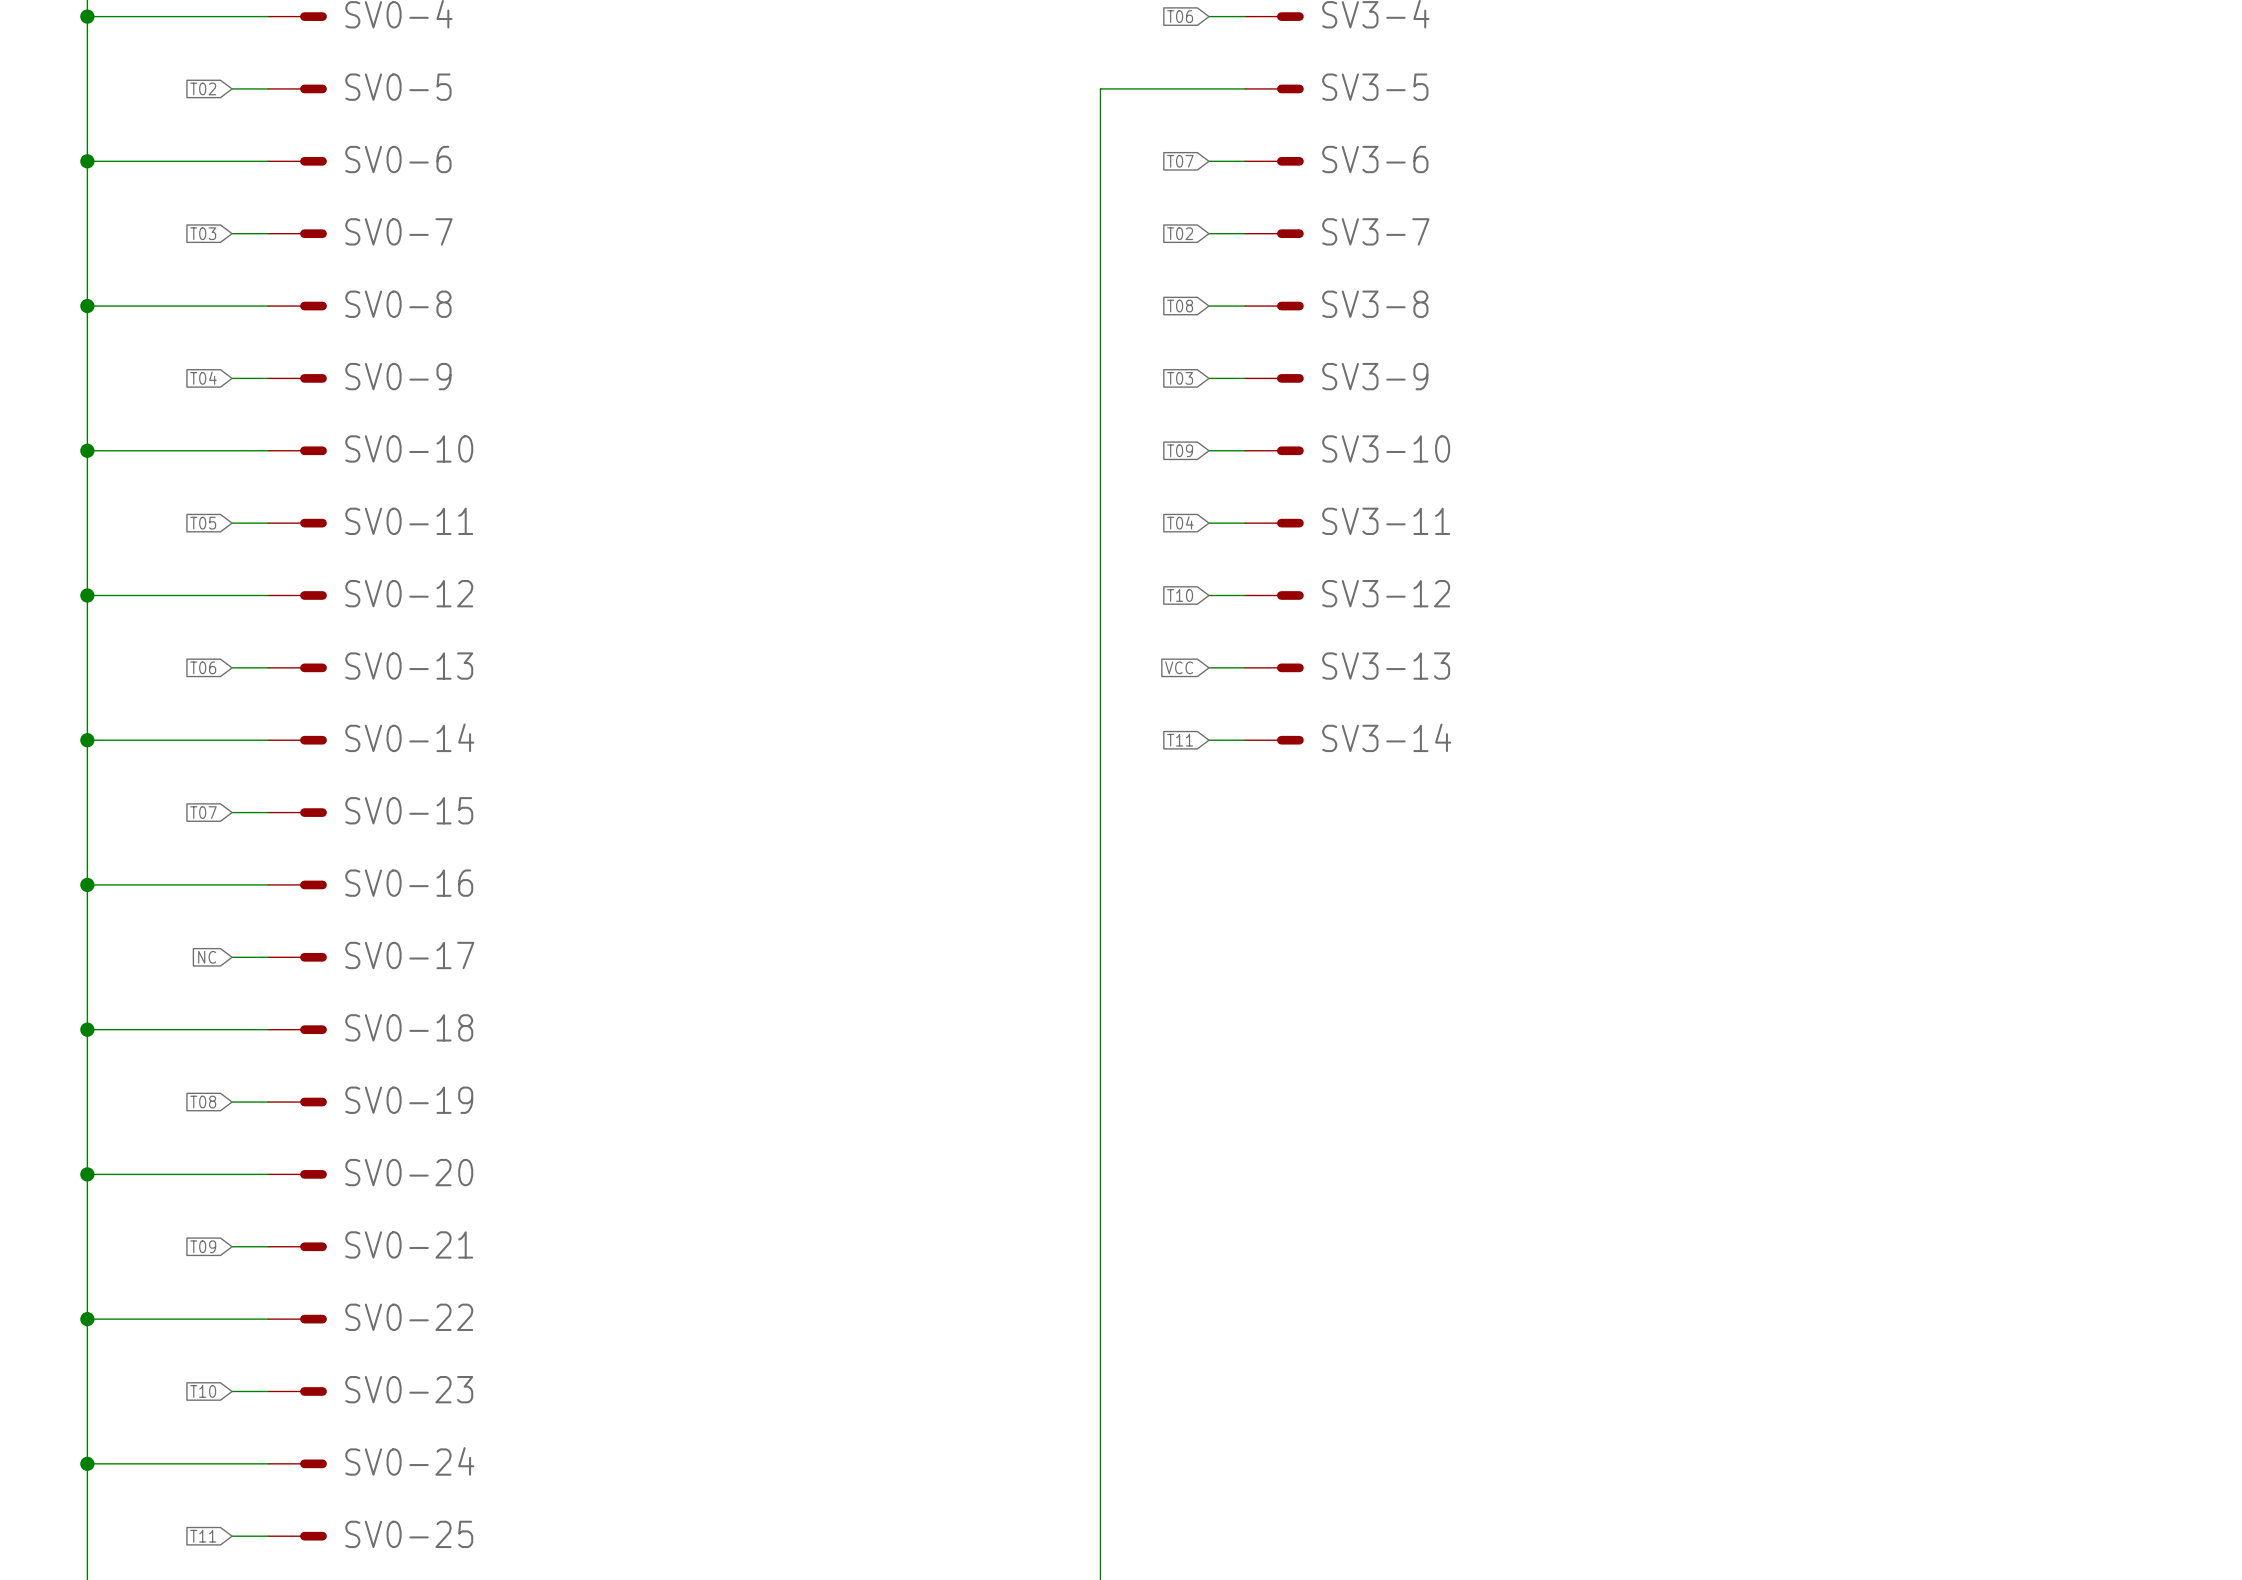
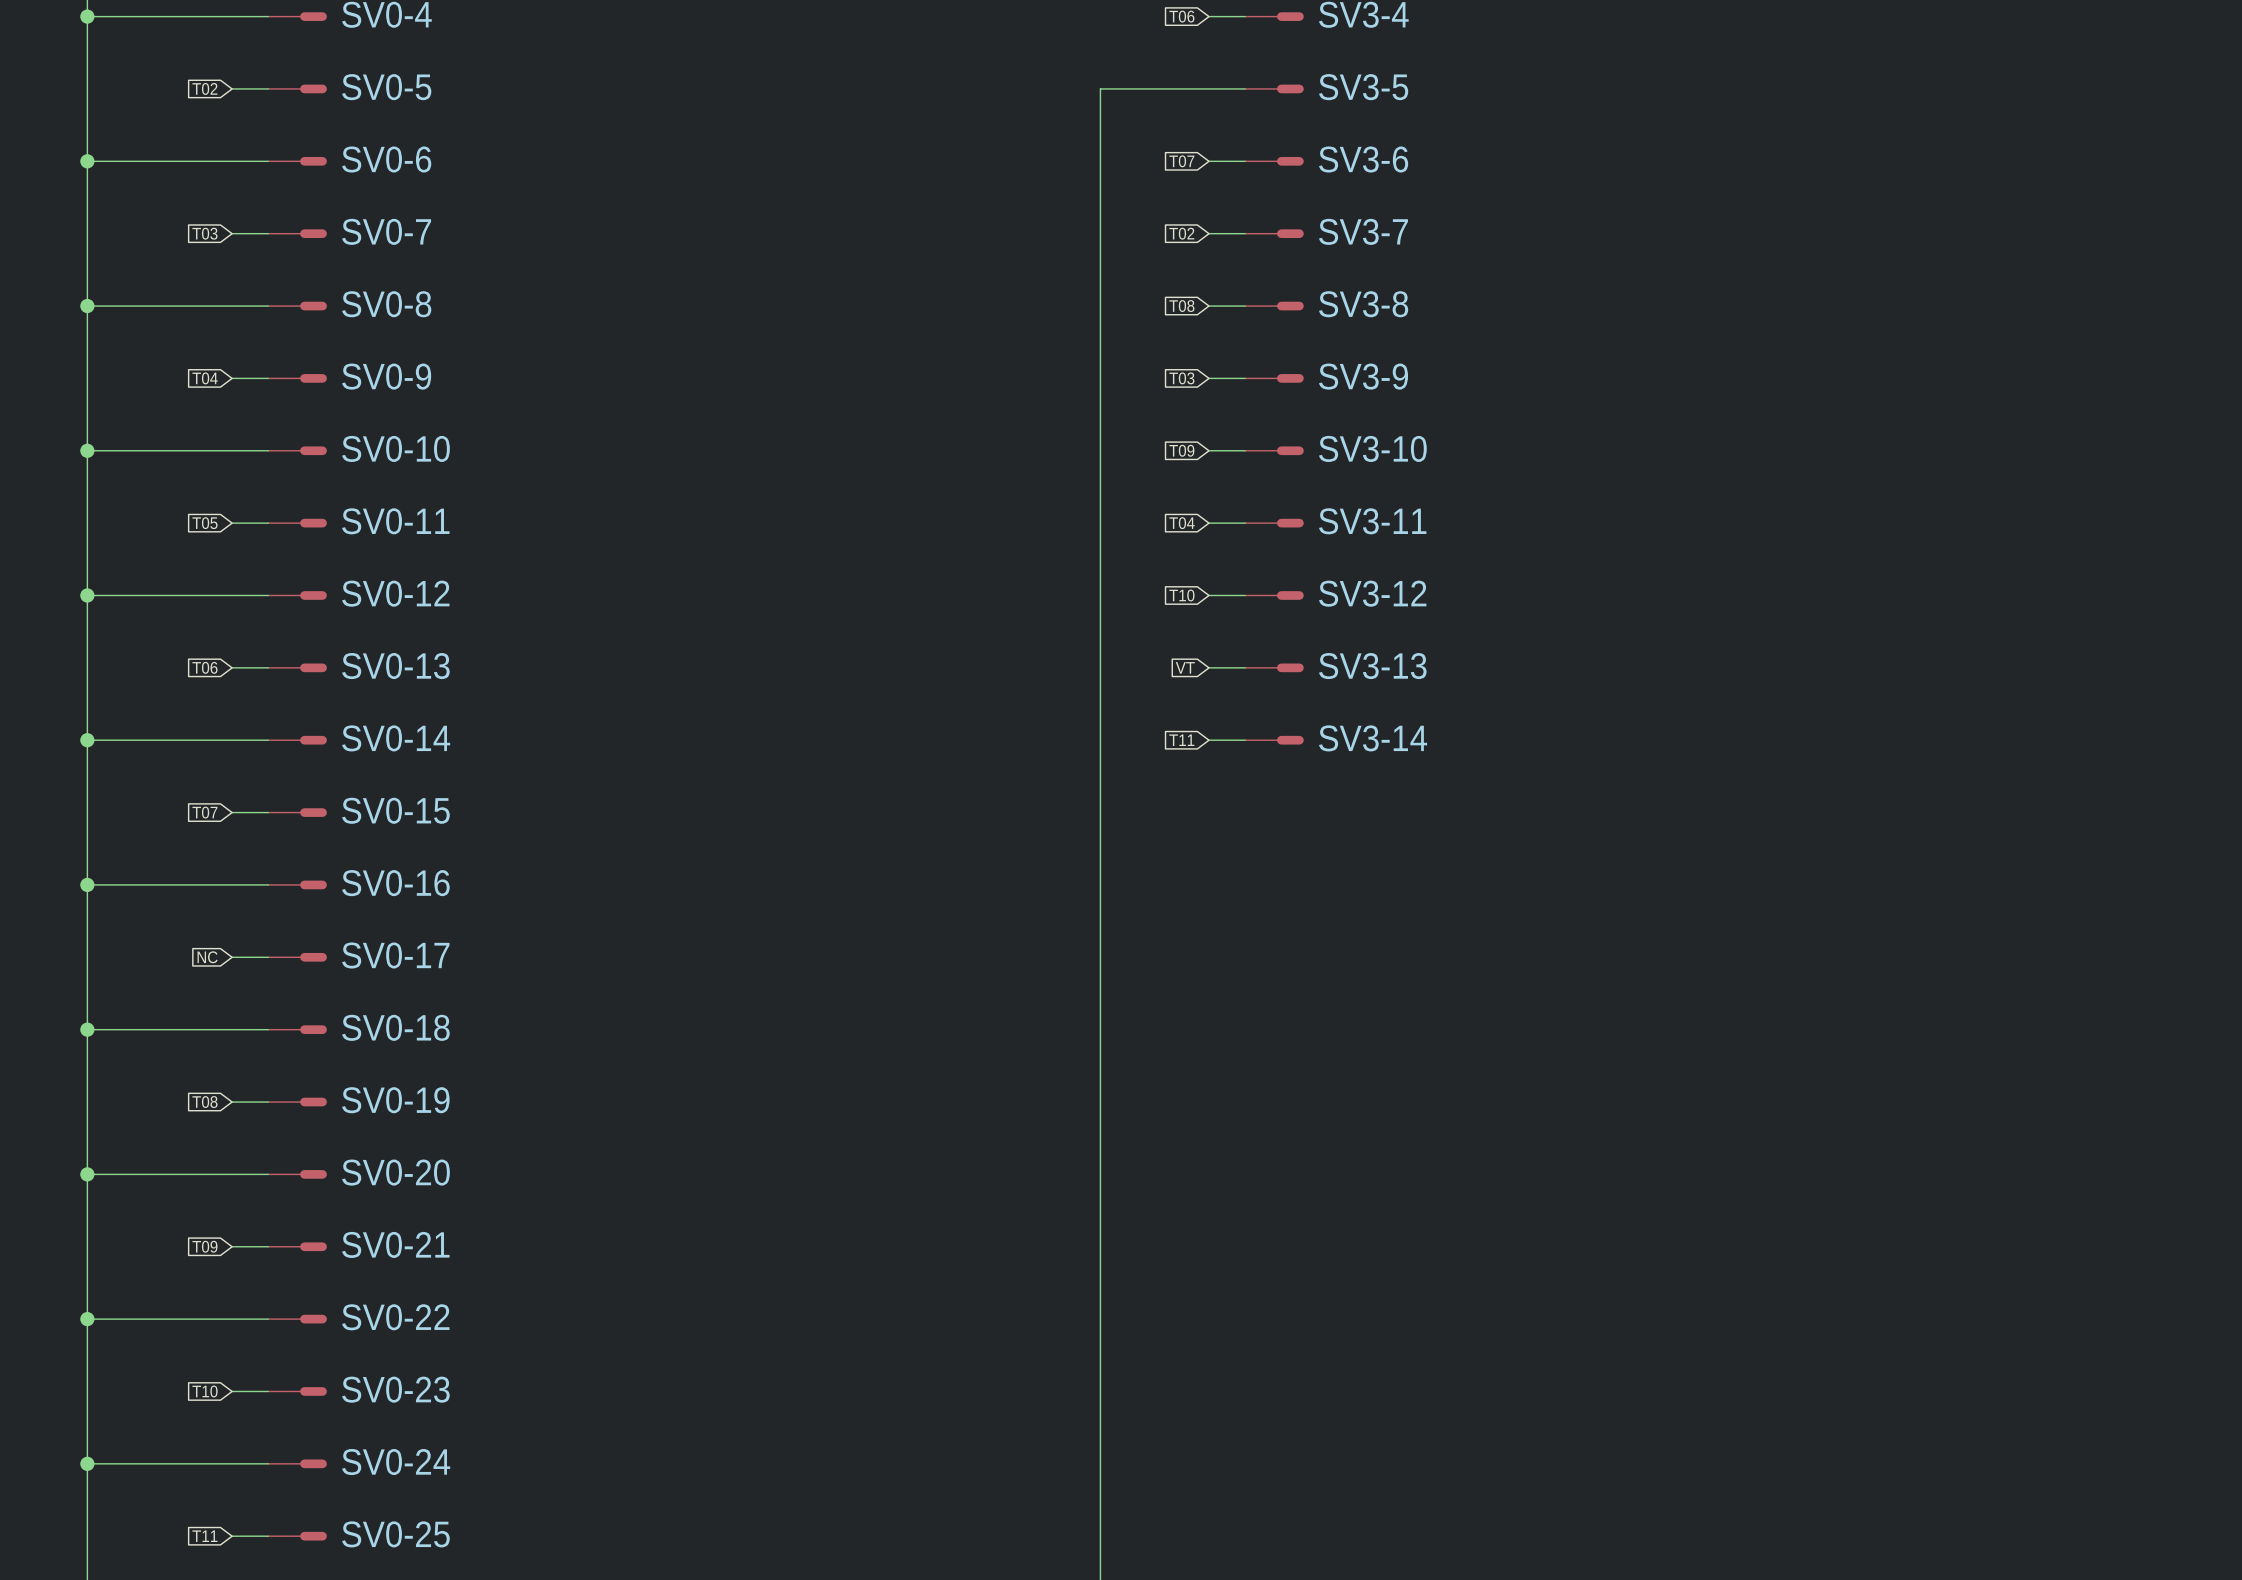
global label: VCC (1179, 667) -> VT (1185, 667)

